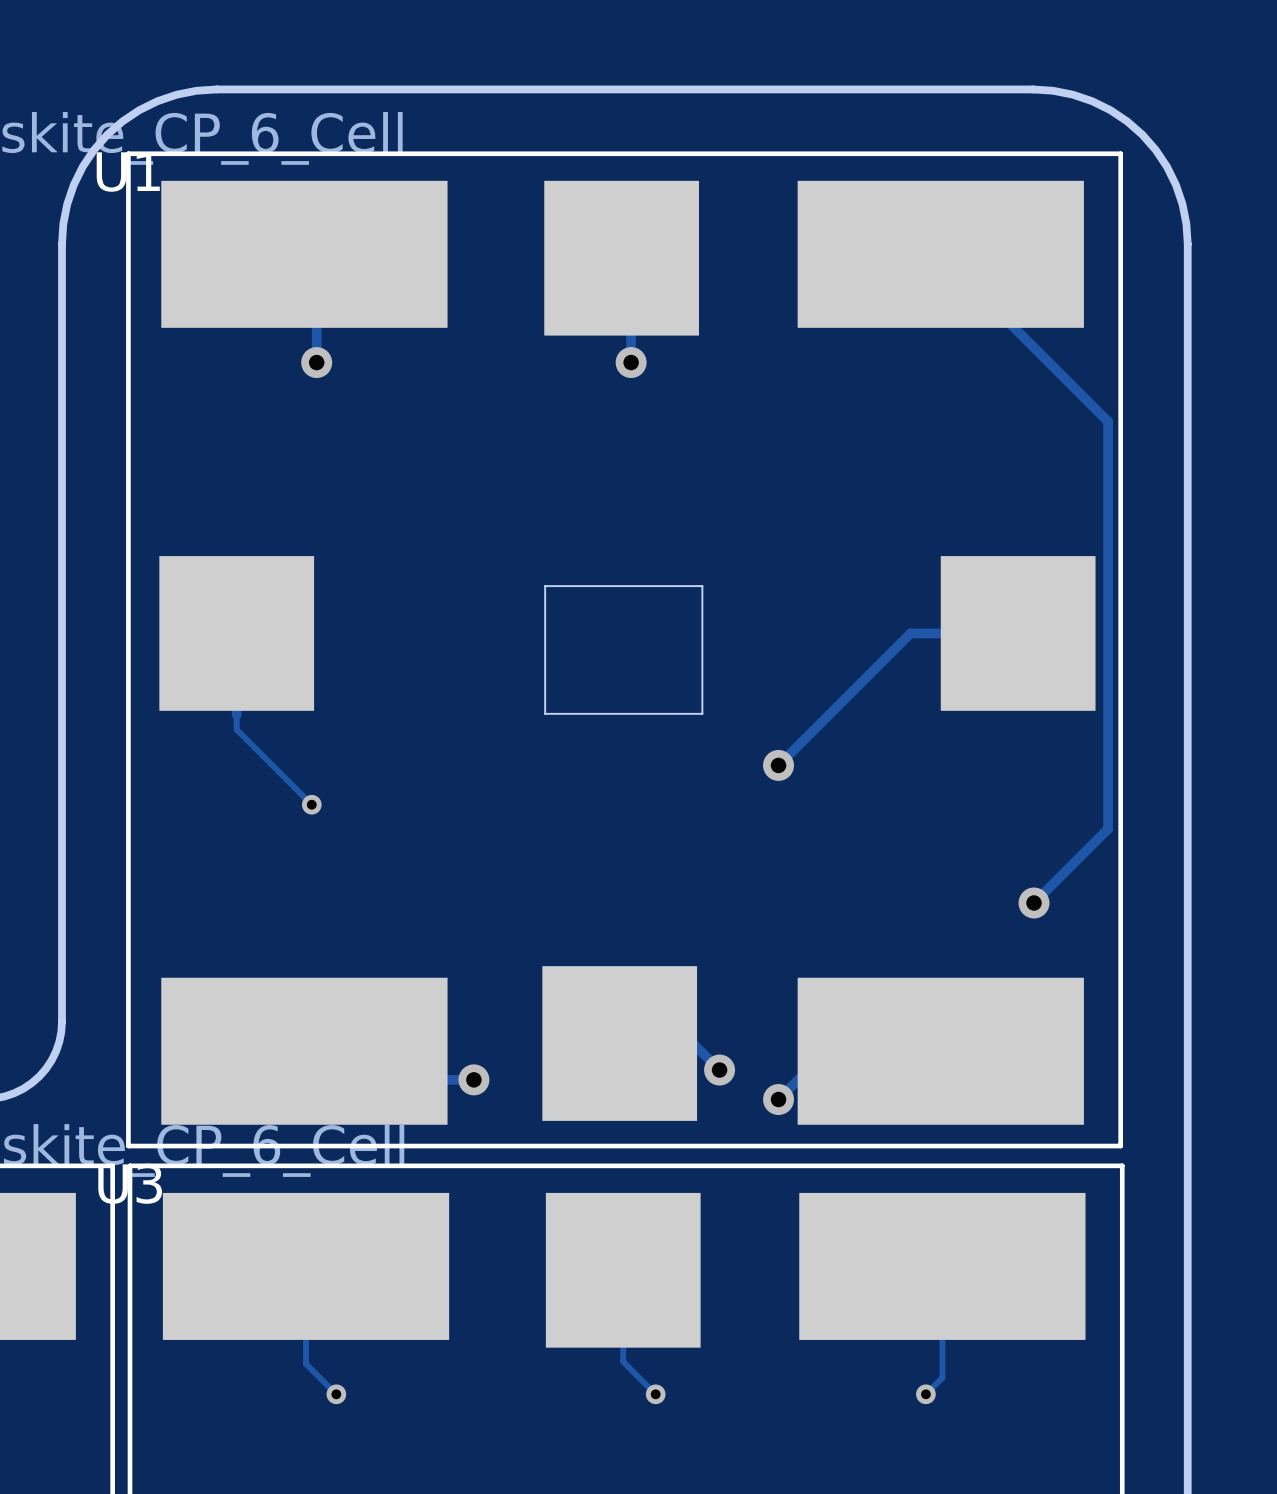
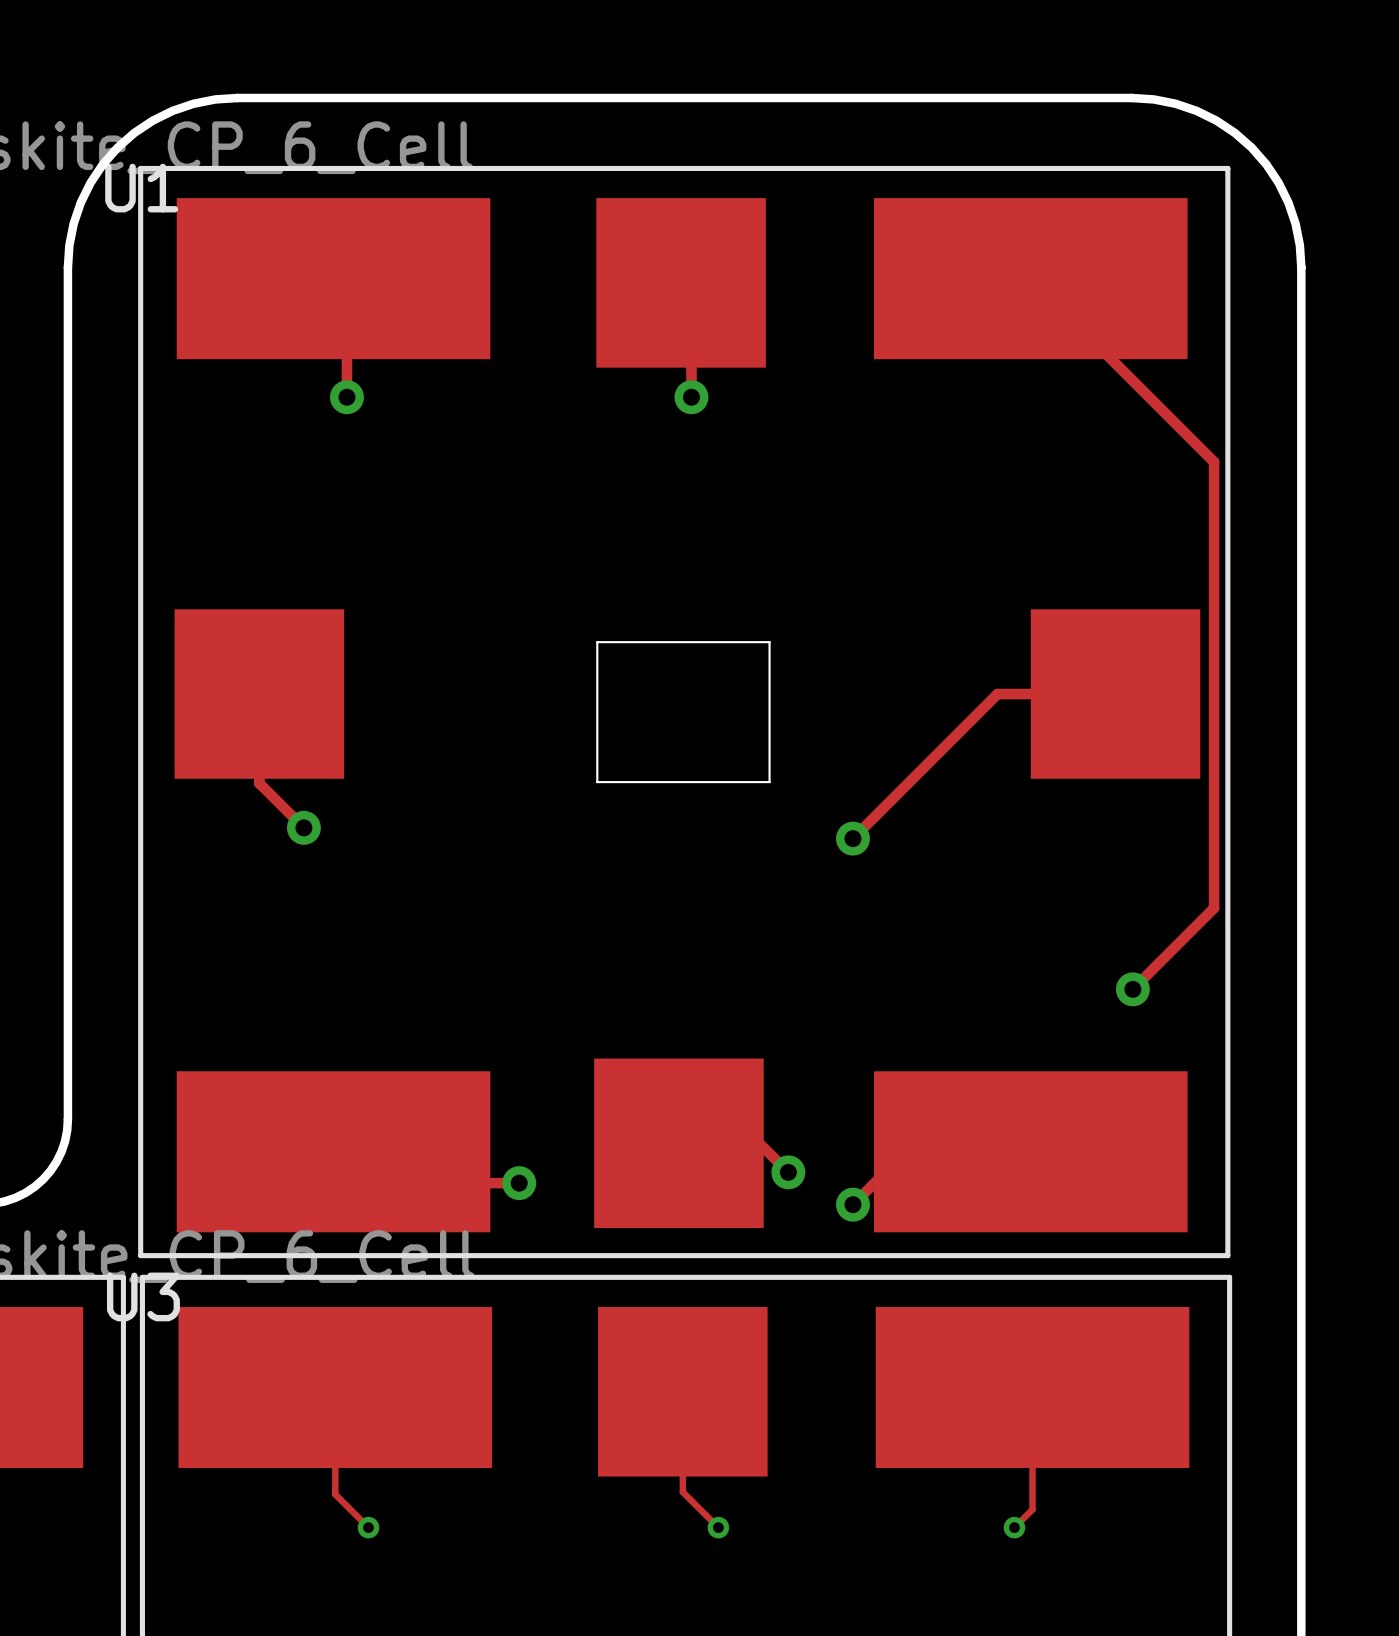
track: (236, 714) (236, 729) (311, 804) -> (259, 783) (303, 827)
via: none -> (303, 827)
via: (311, 804) -> none

